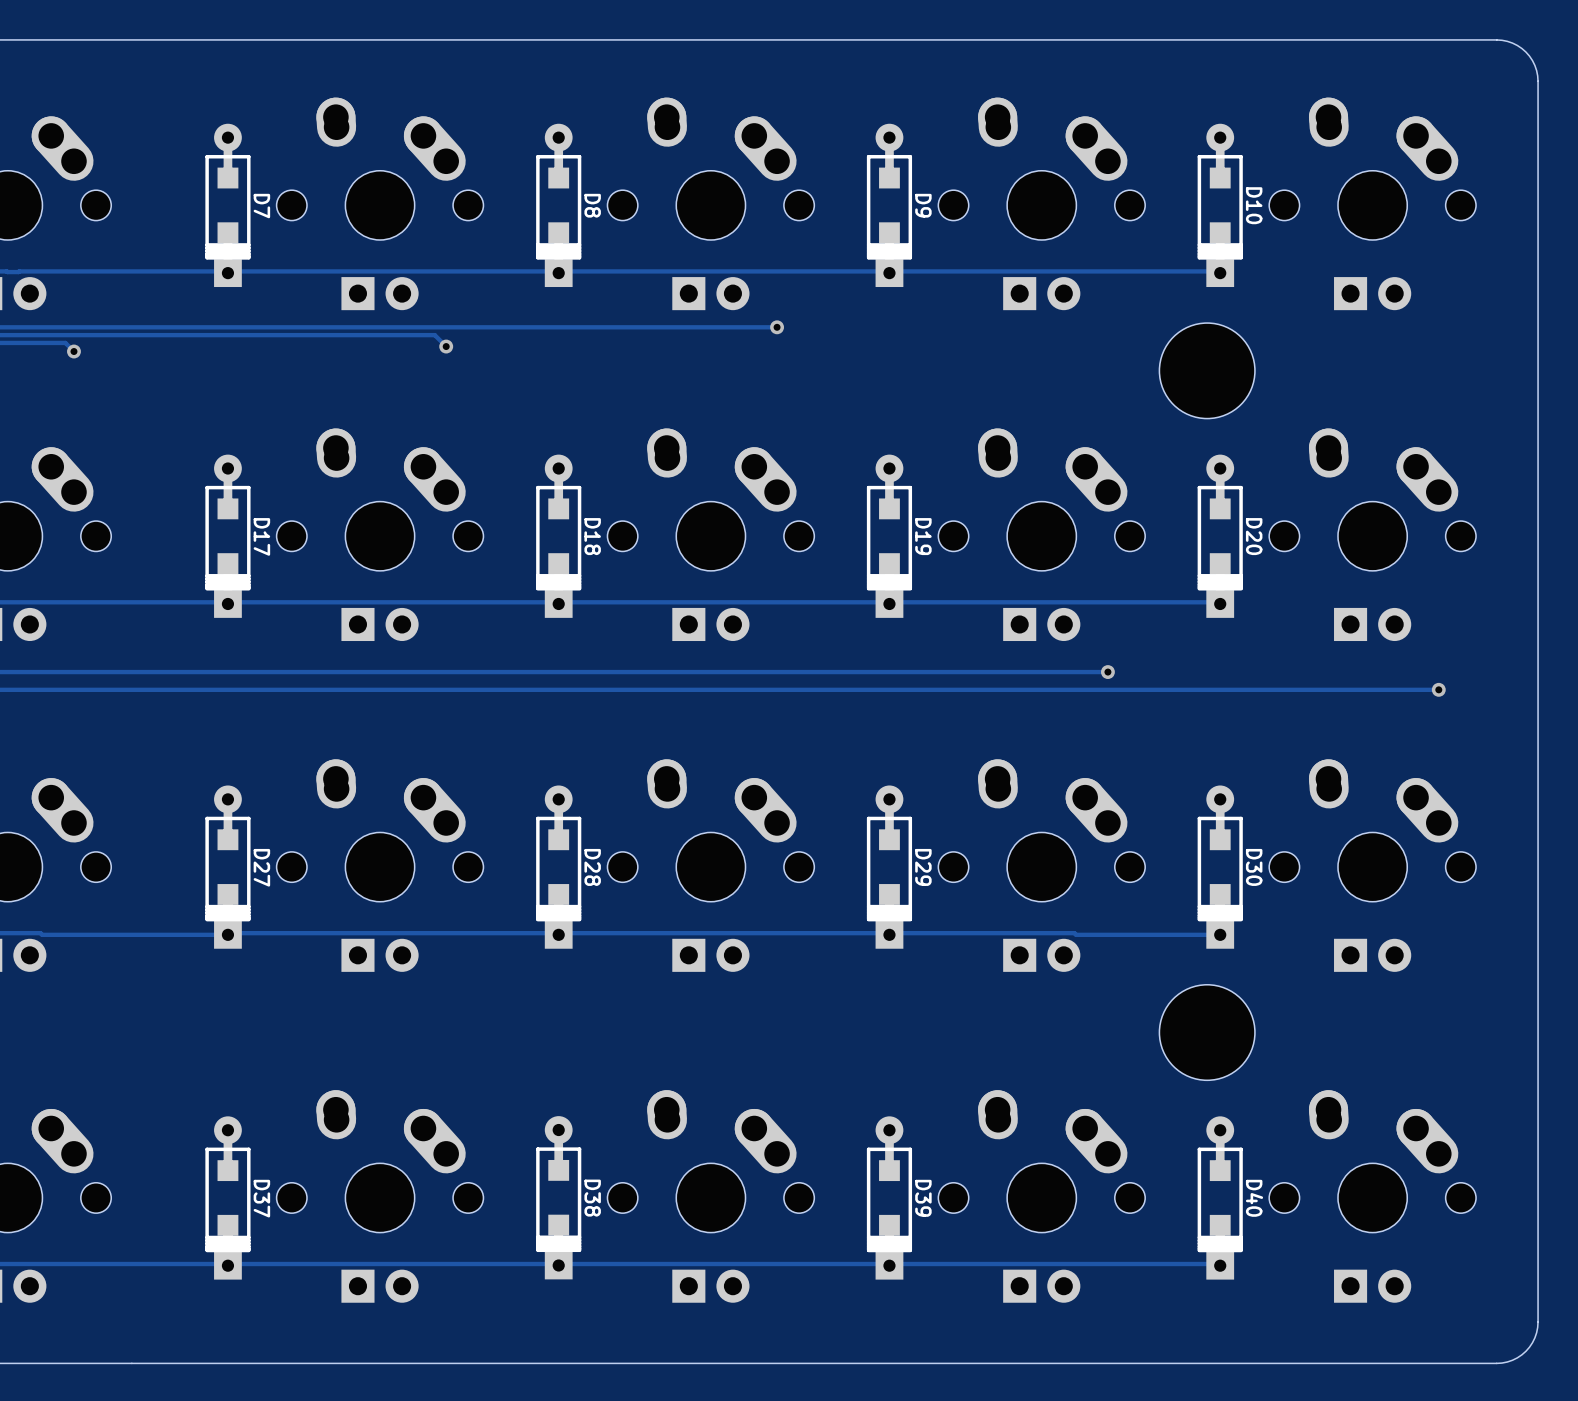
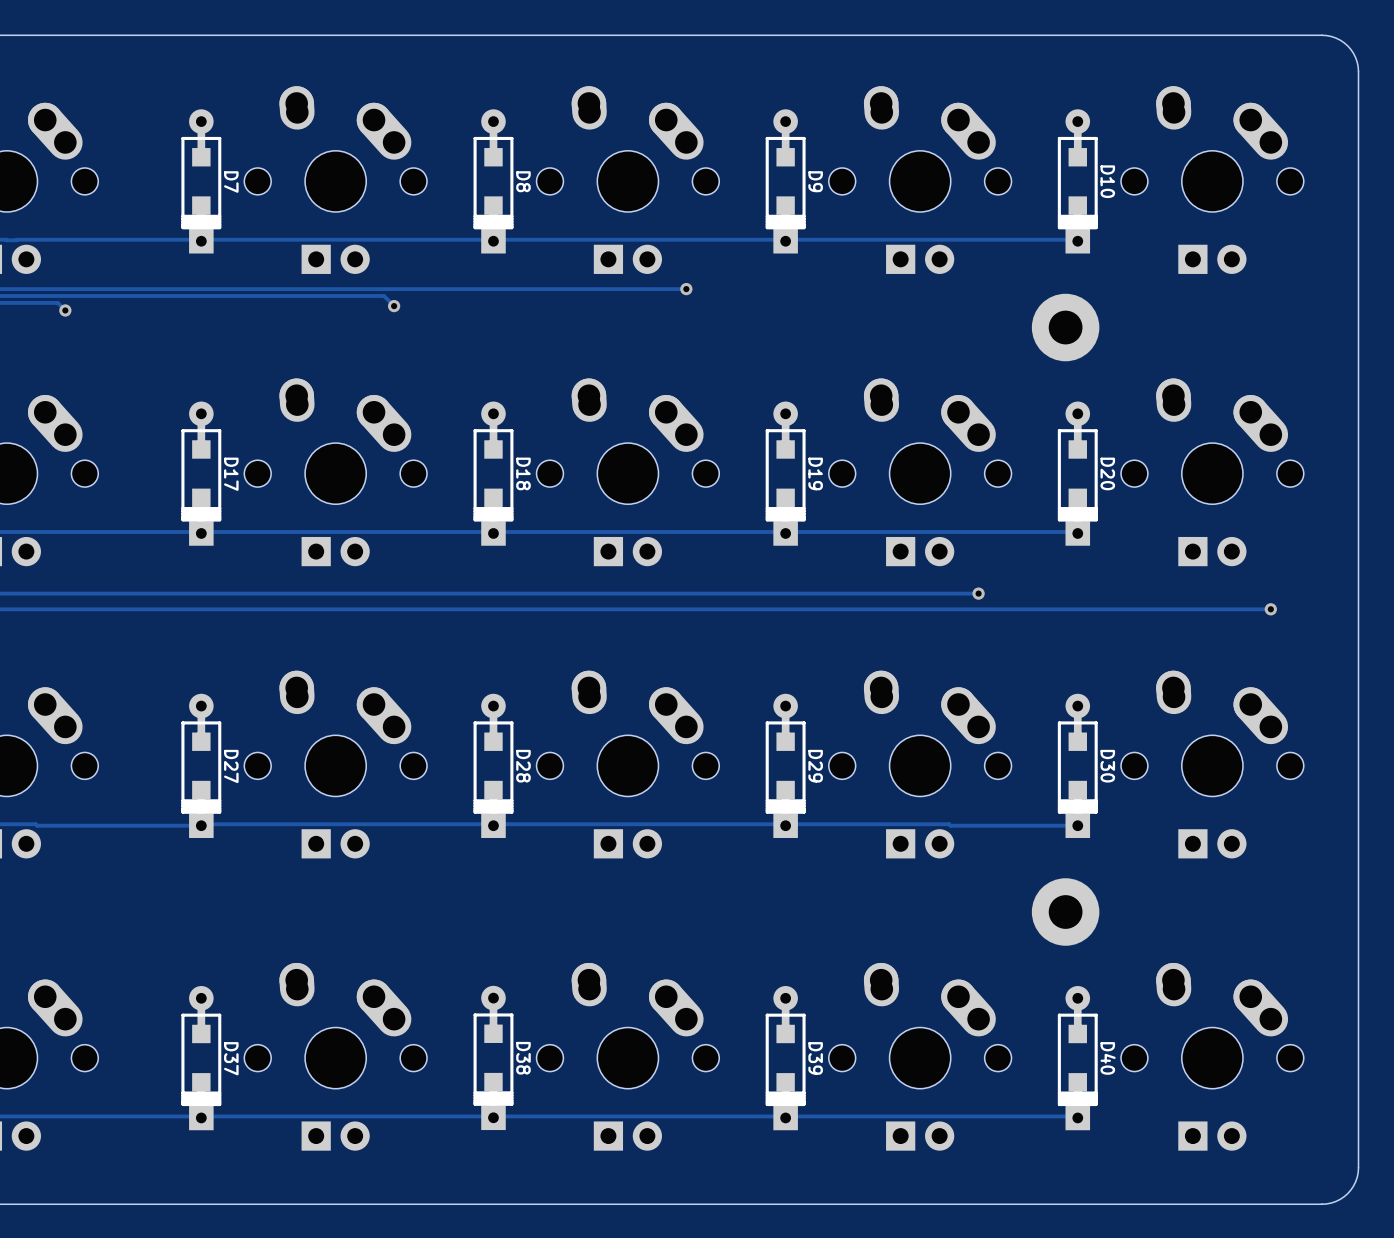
part footprint: [1159, 323, 1255, 419] -> [1031, 293, 1100, 362]
part footprint: [1159, 984, 1255, 1081] -> [1031, 878, 1100, 946]

